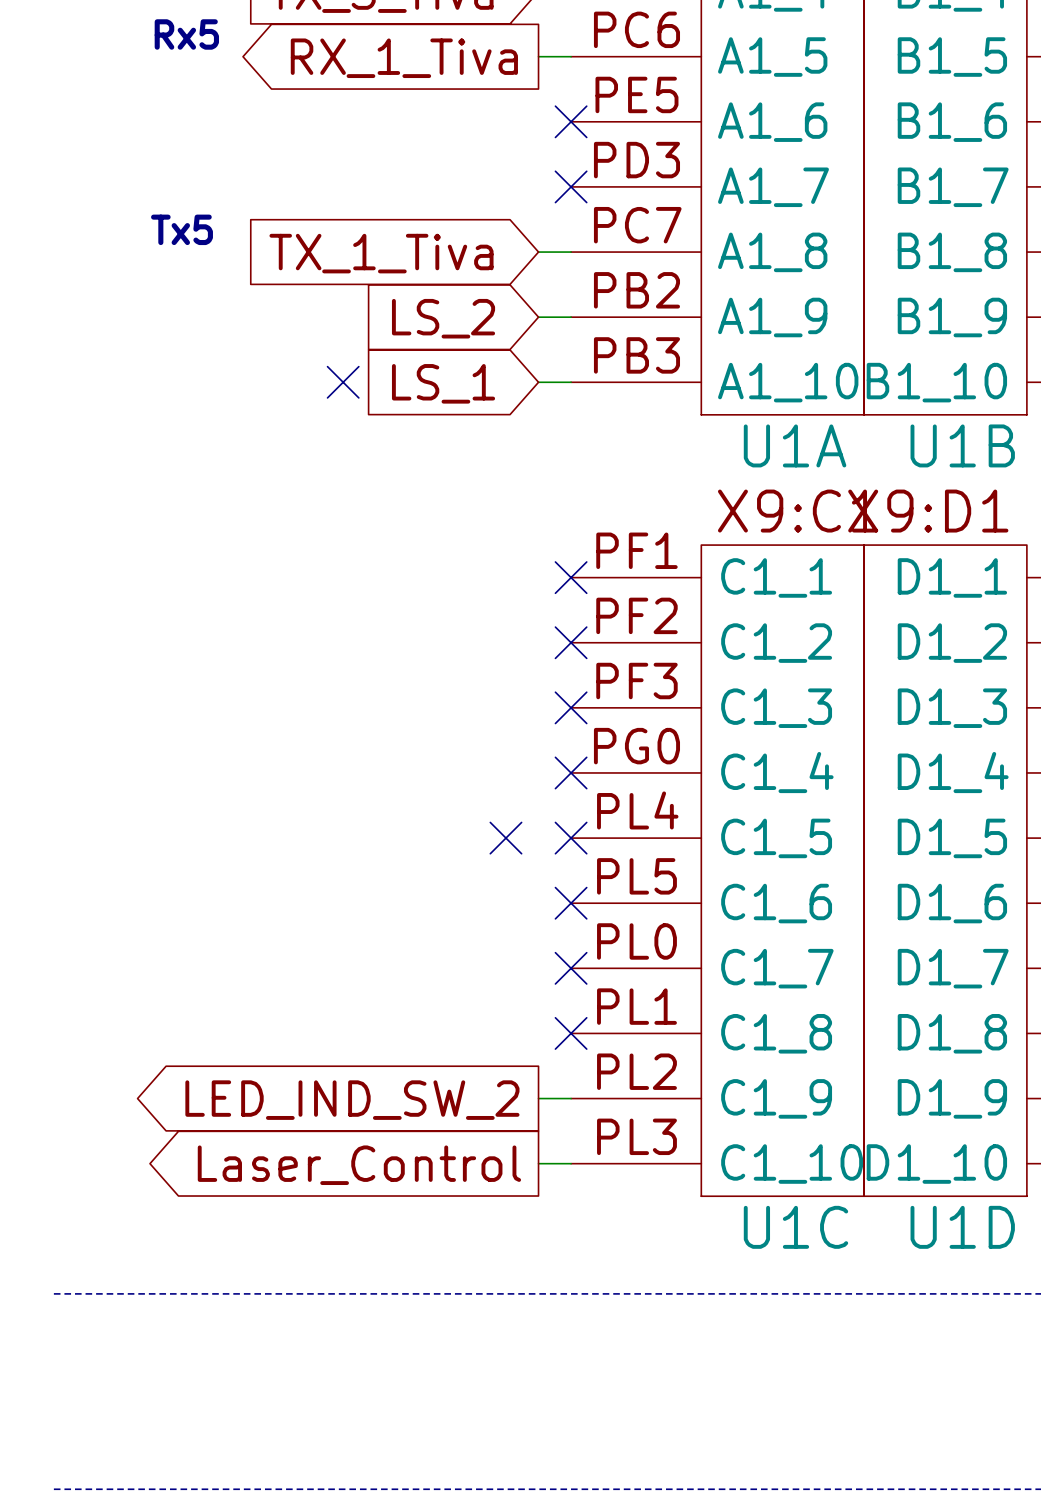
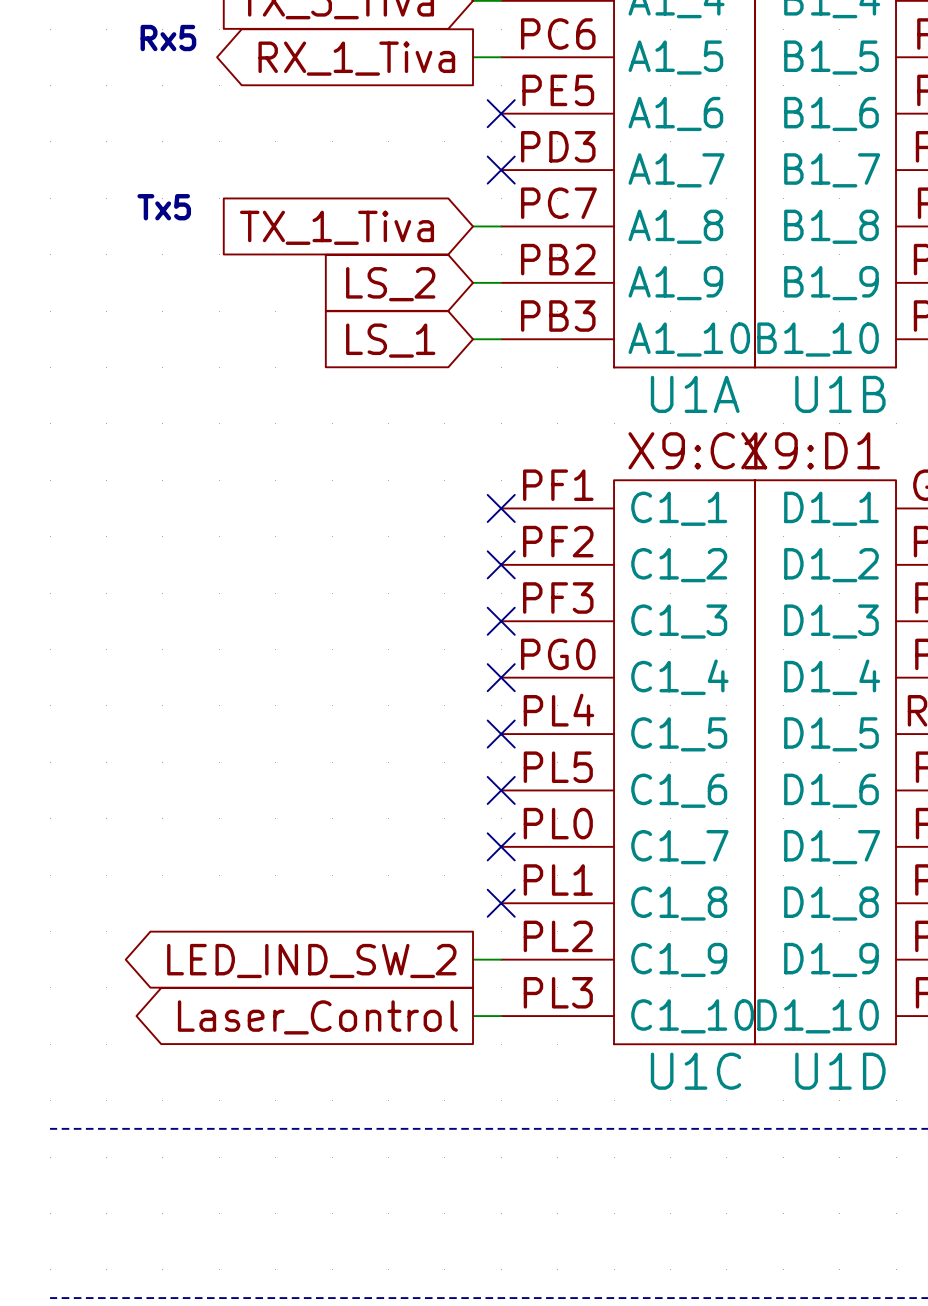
no-connect mark: (343, 382) -> none
no-connect mark: (505, 838) -> none

